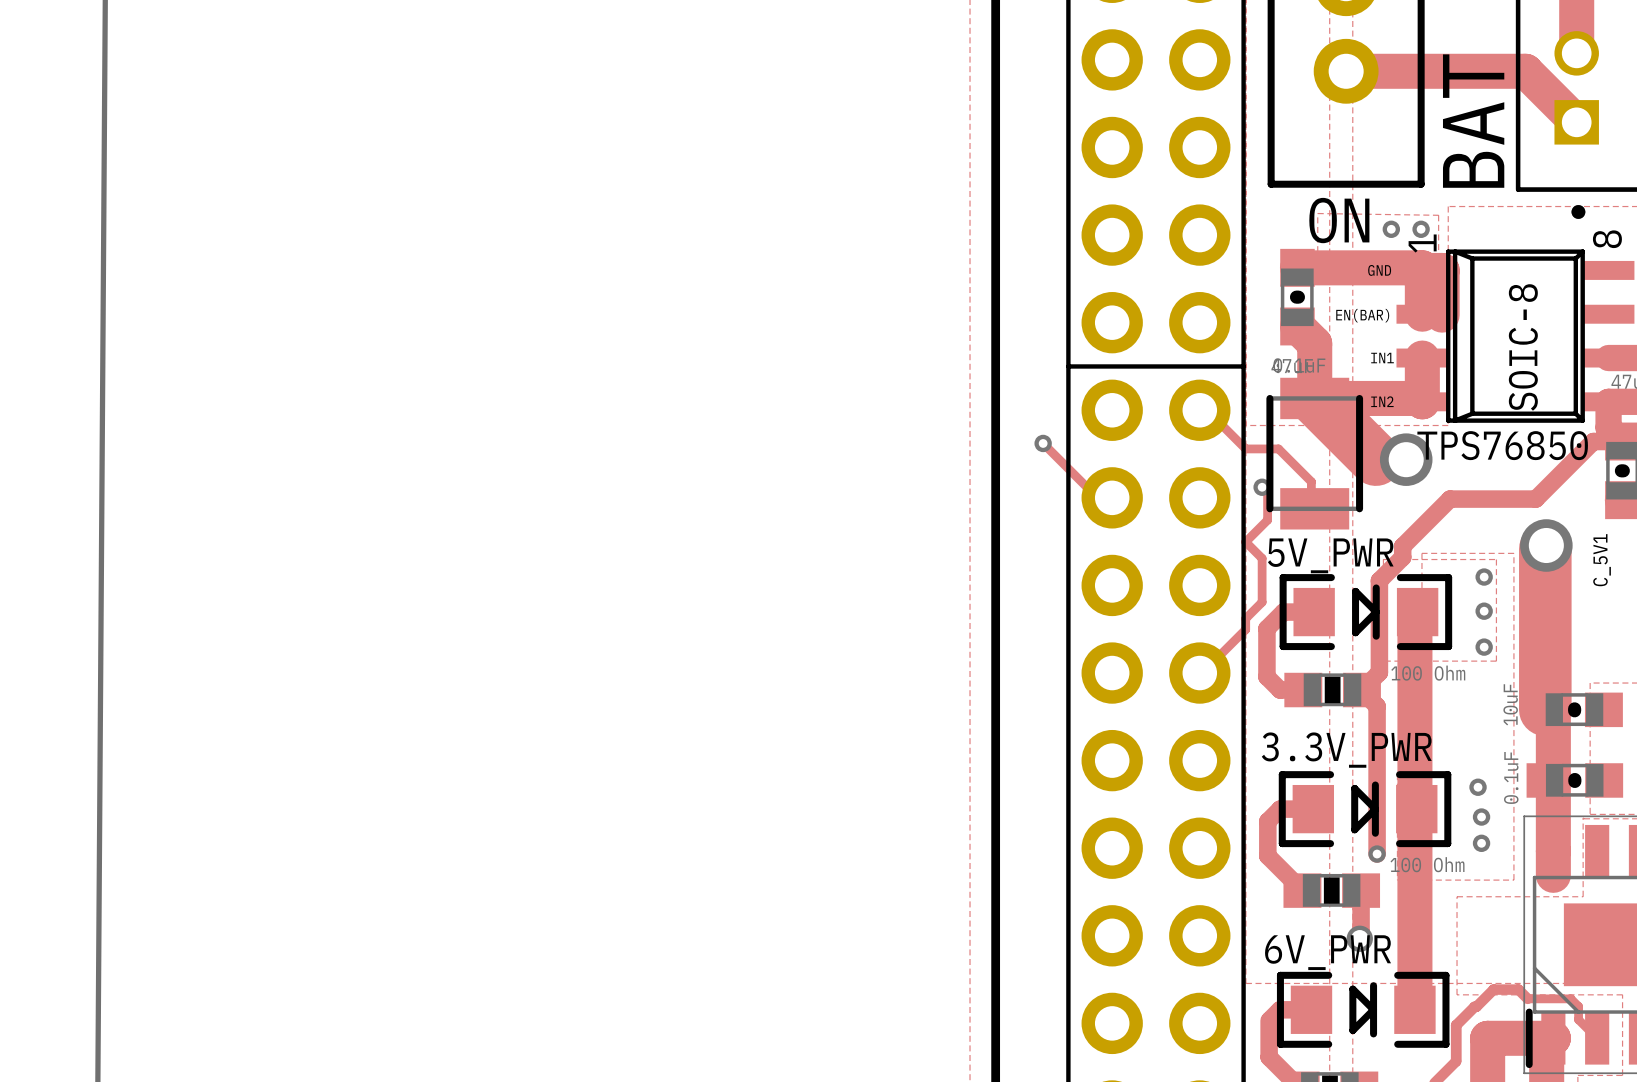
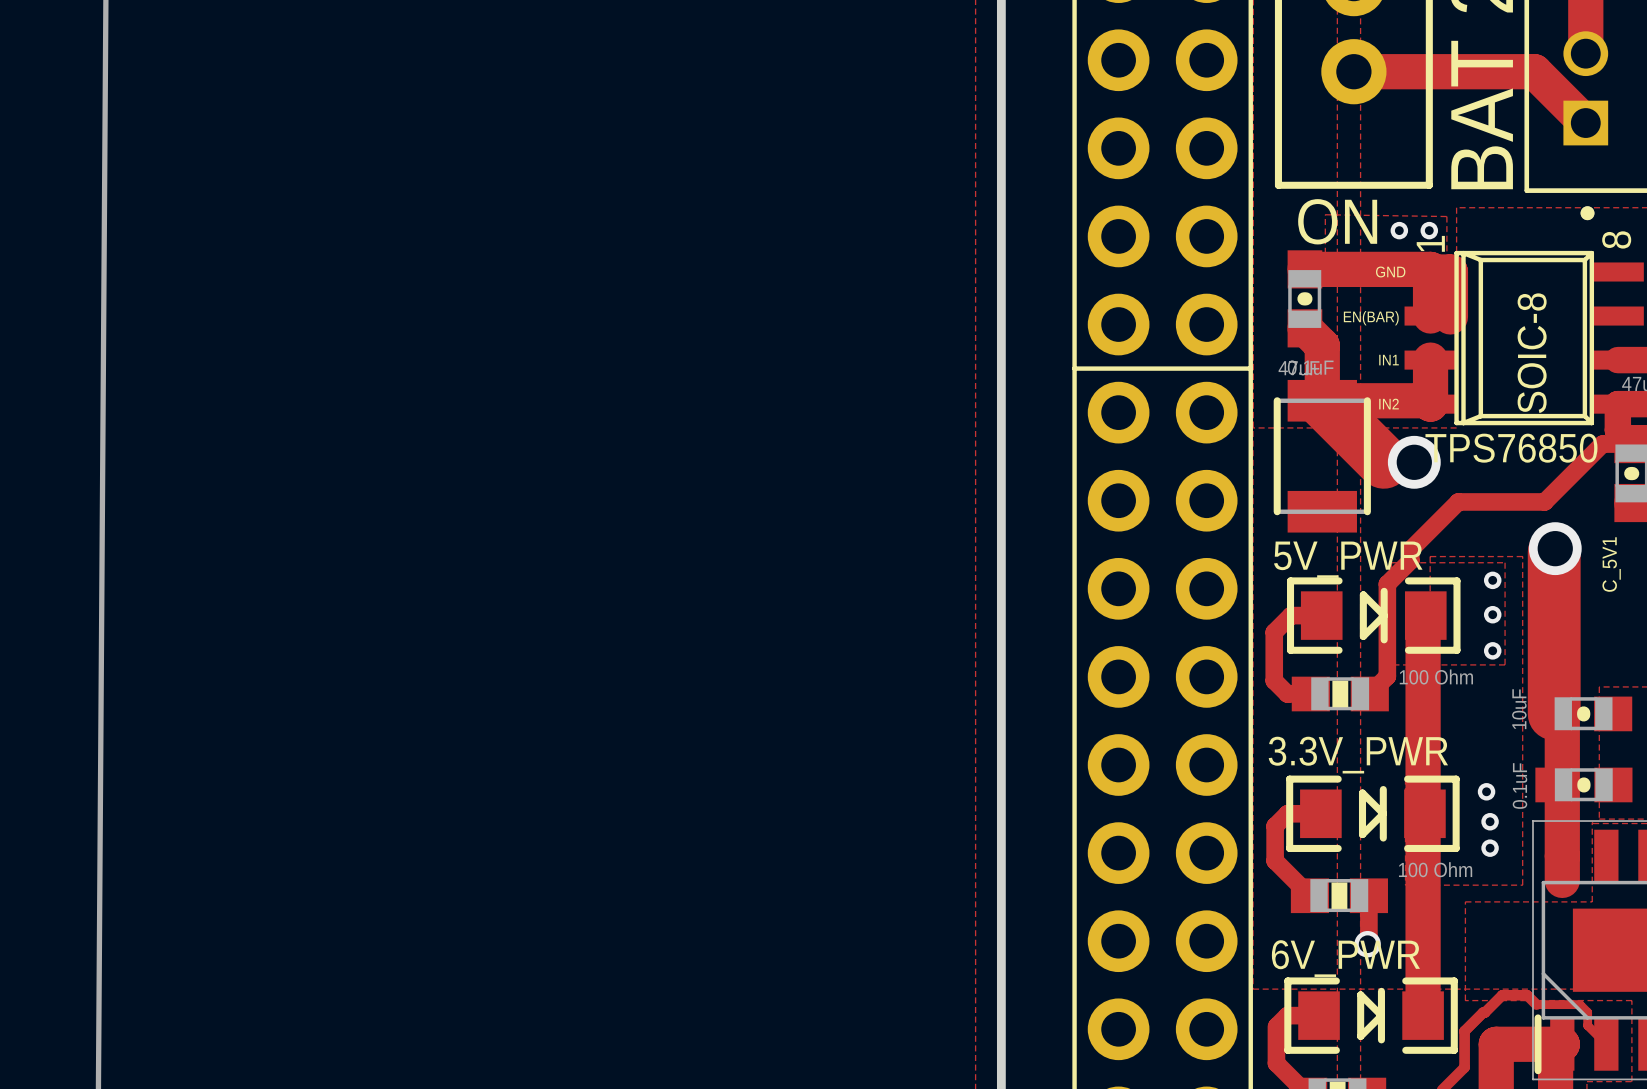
track: (1199, 410) (1201, 405) (1245, 448) (1278, 448) (1311, 481) (1311, 503) (1314, 508) -> none
track: (1043, 443) (1092, 492) (1108, 492) (1112, 497) -> none
via: (1043, 443) -> none
track: (1262, 487) (1267, 492) (1267, 520) (1245, 542) (1262, 558) (1262, 602) (1245, 618) (1245, 629) (1201, 673) (1199, 673) -> none
via: (1262, 487) -> none
track: (1361, 690) (1377, 706) (1377, 854) -> none
via: (1377, 854) -> none

